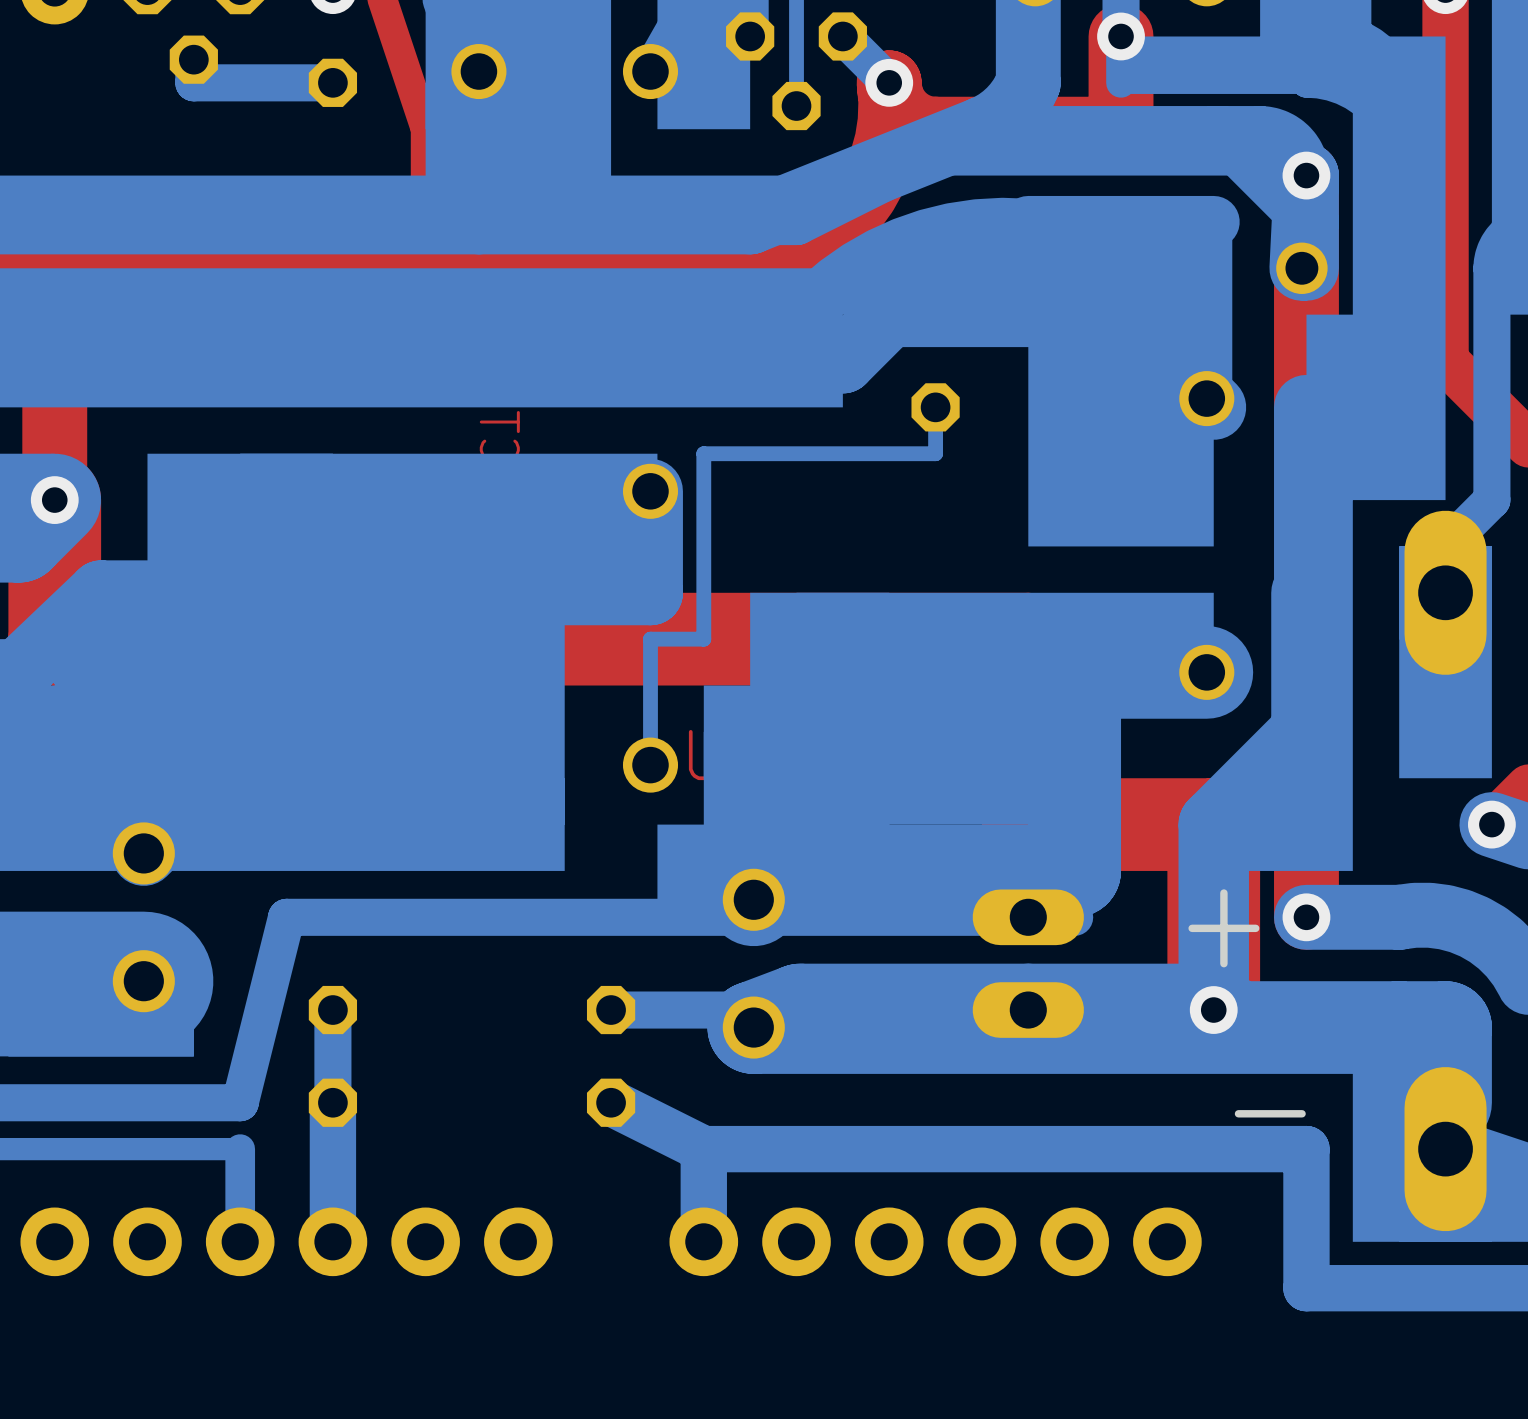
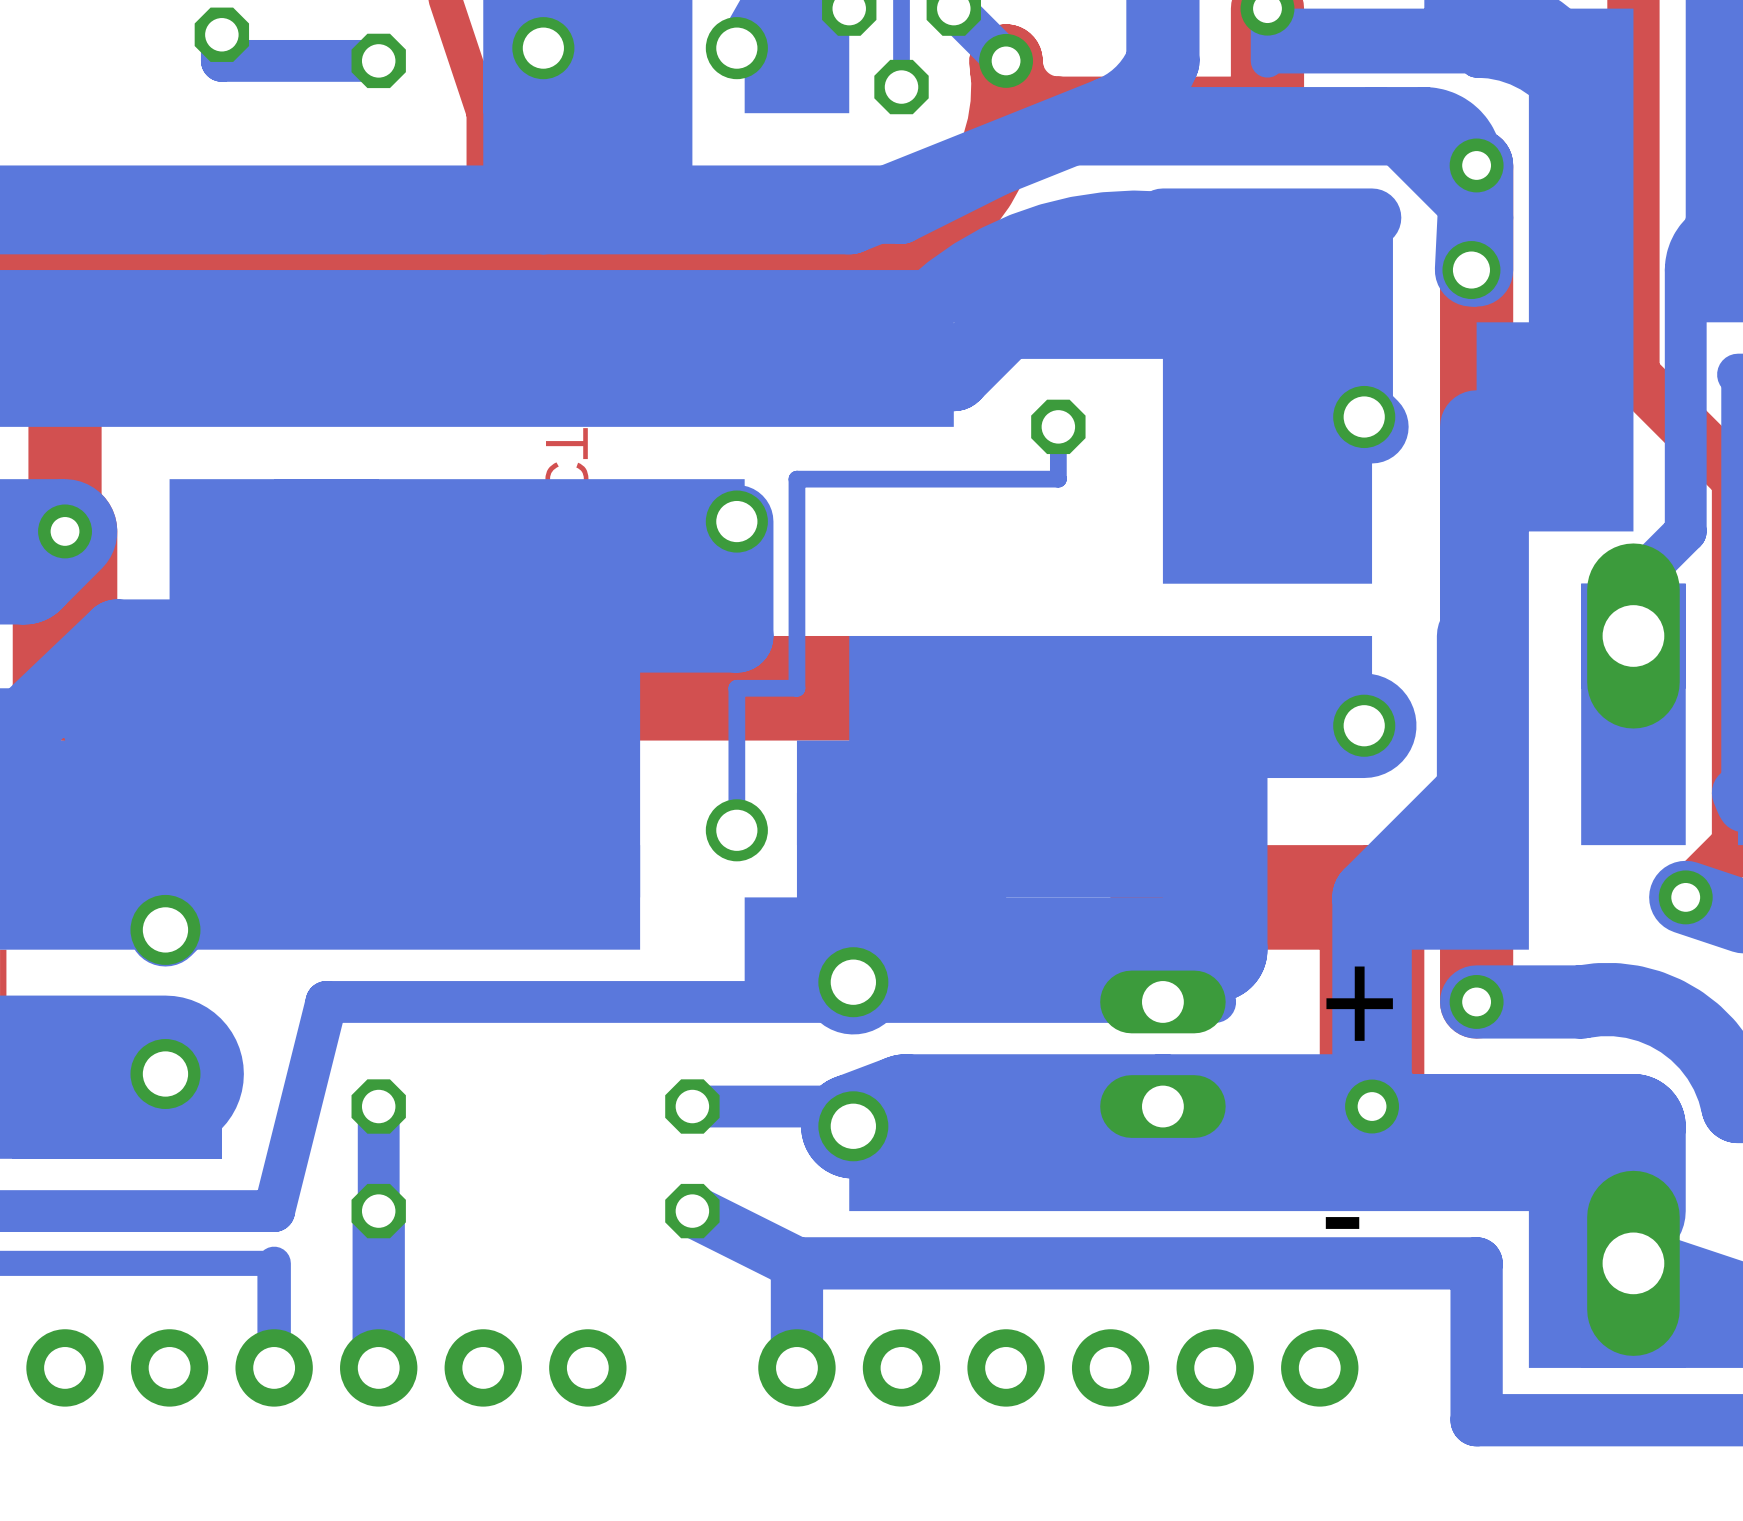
drawing: none -> [849, 1158, 1582, 1212]
text position: - (1270, 1113) -> - (1342, 1222)

